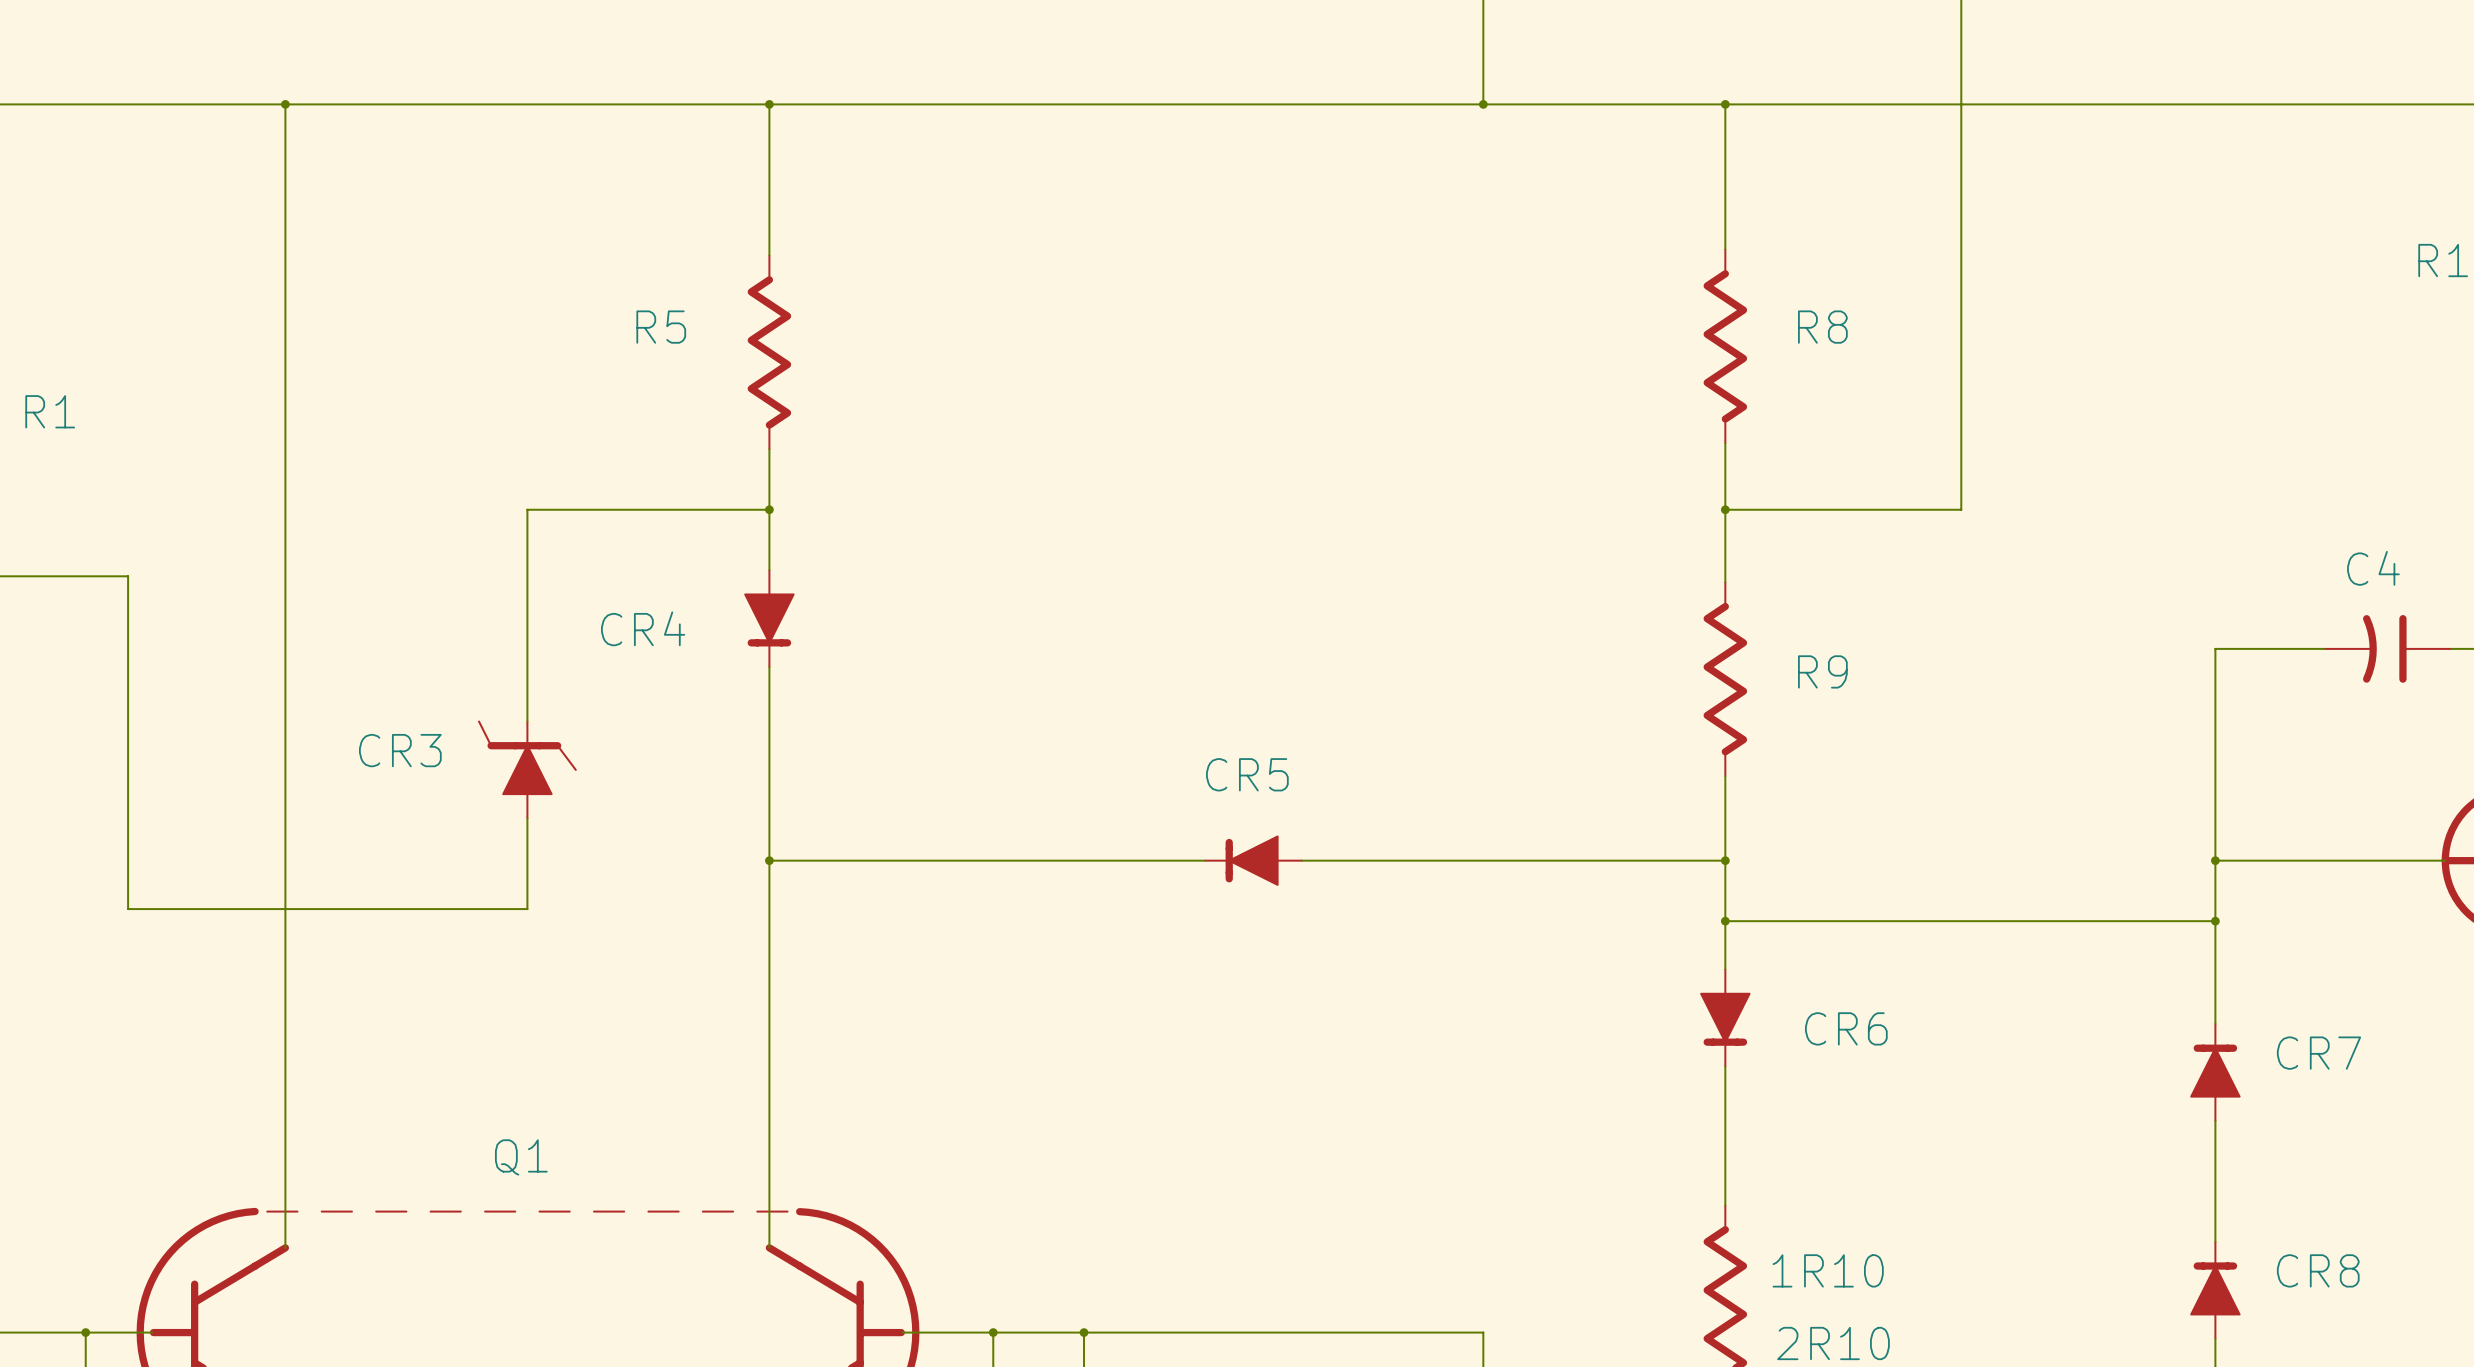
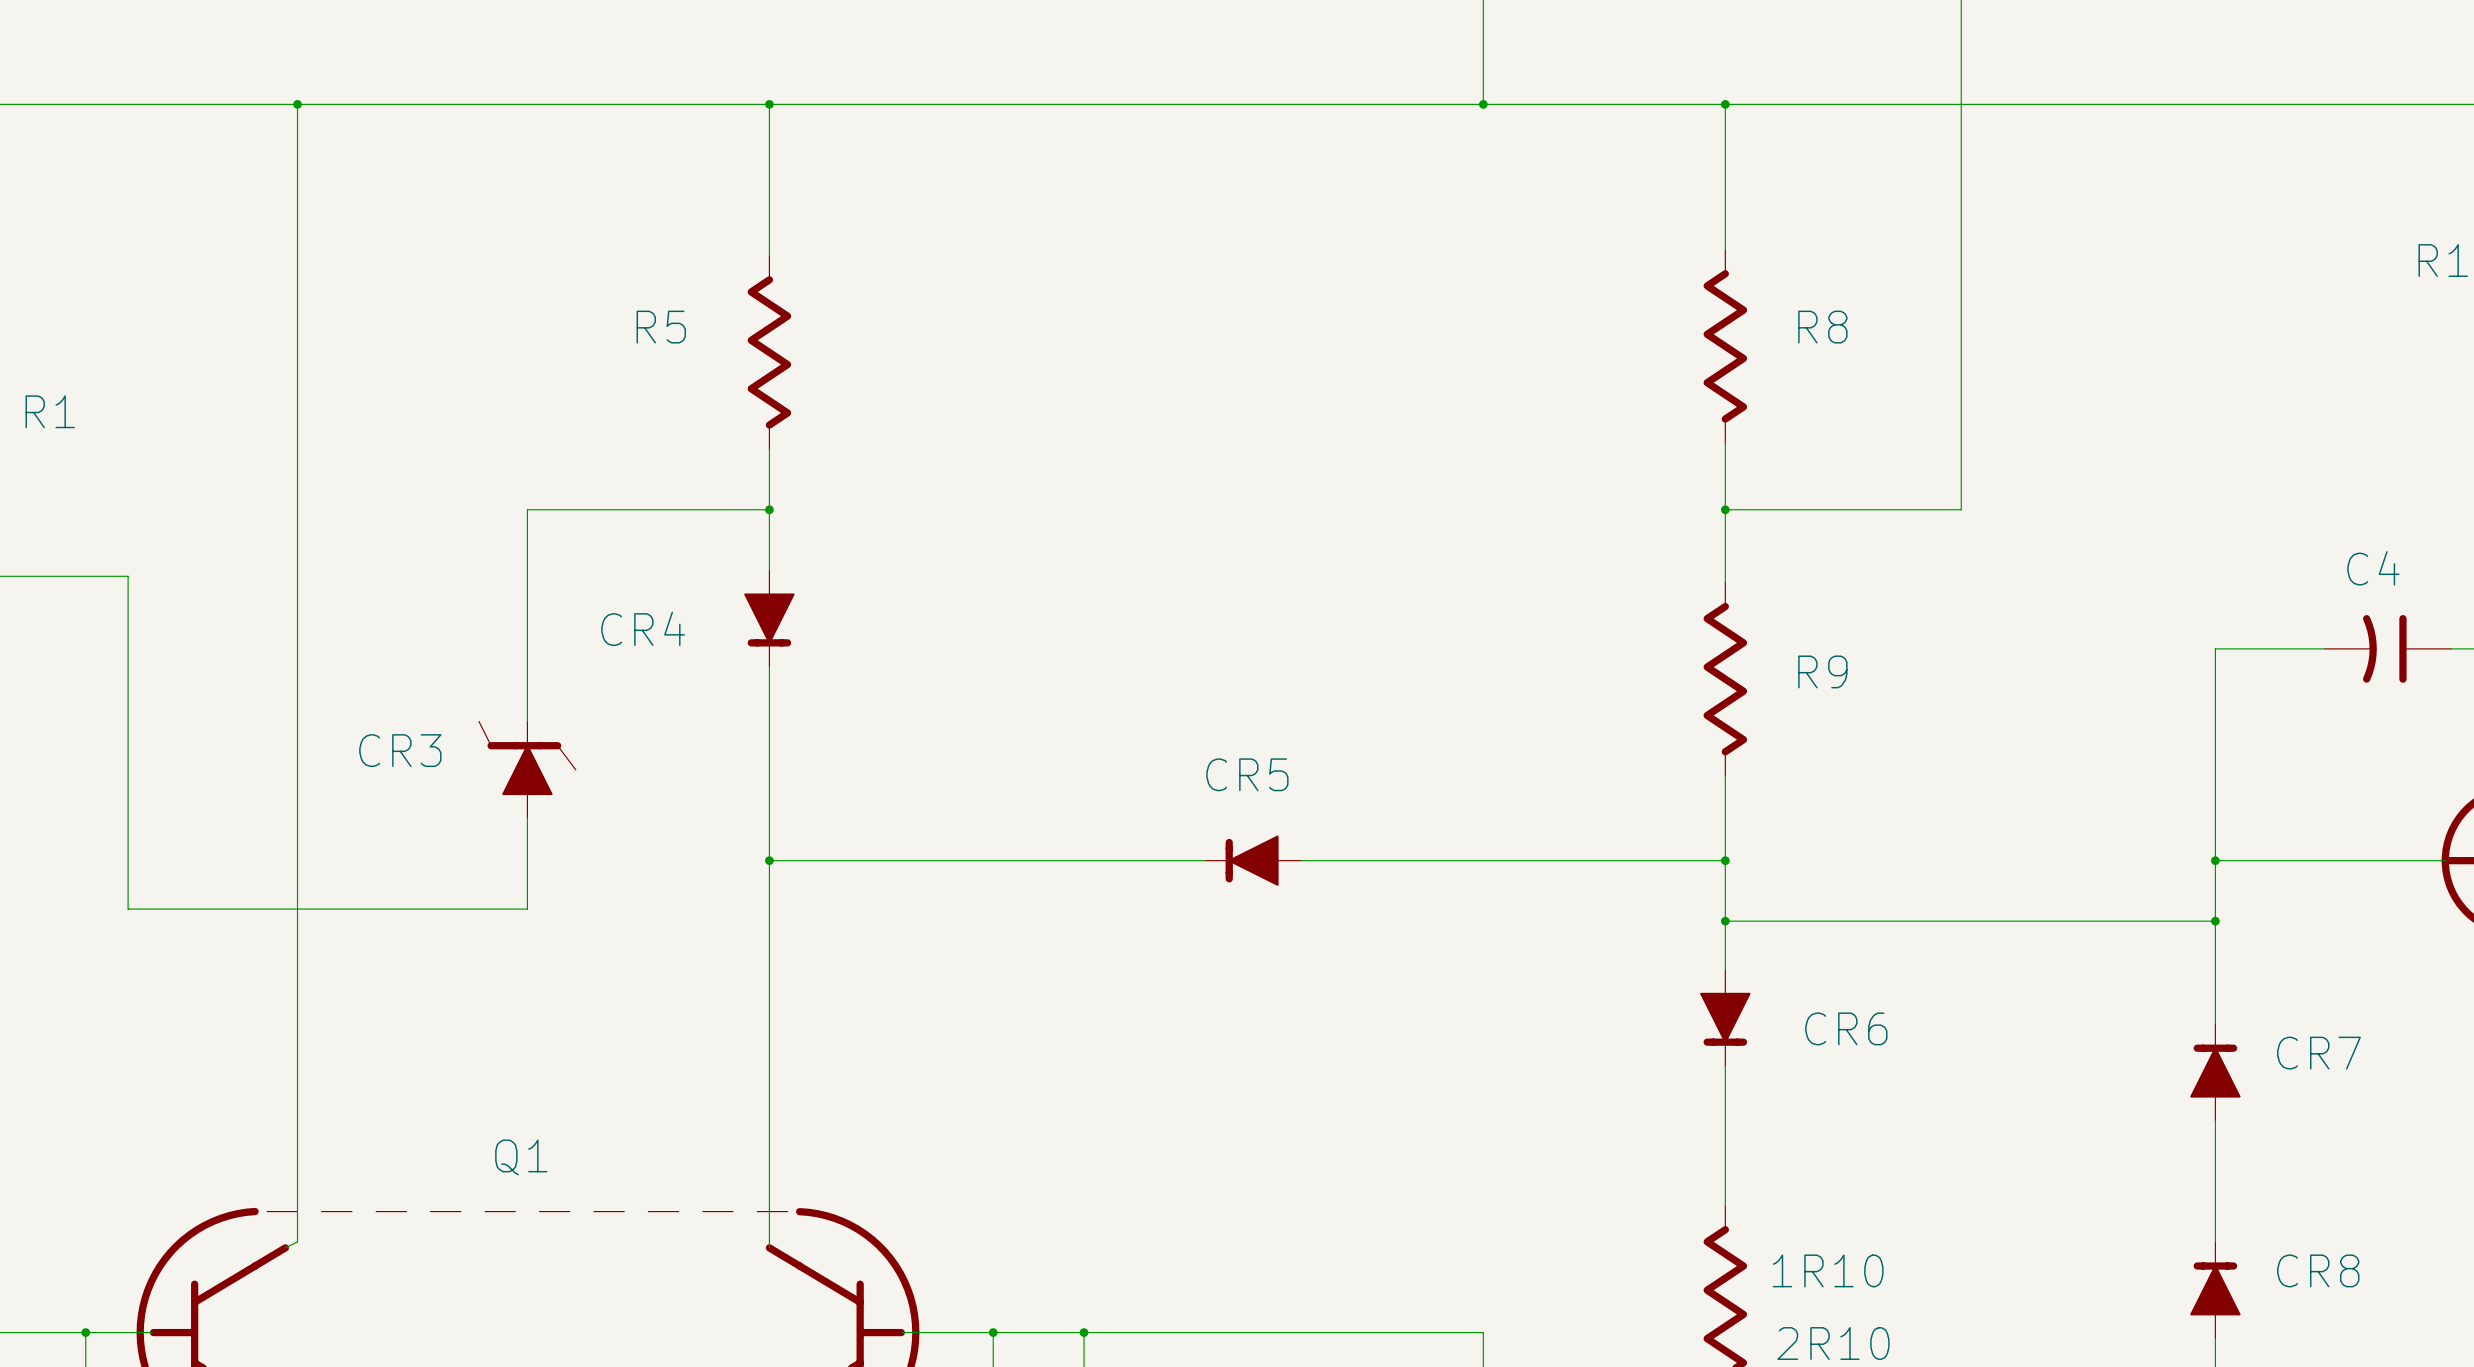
wire: (285, 104) (285, 1247) -> (297, 104) (297, 1241) (285, 1247)
junction position: (285, 104) -> (297, 104)

